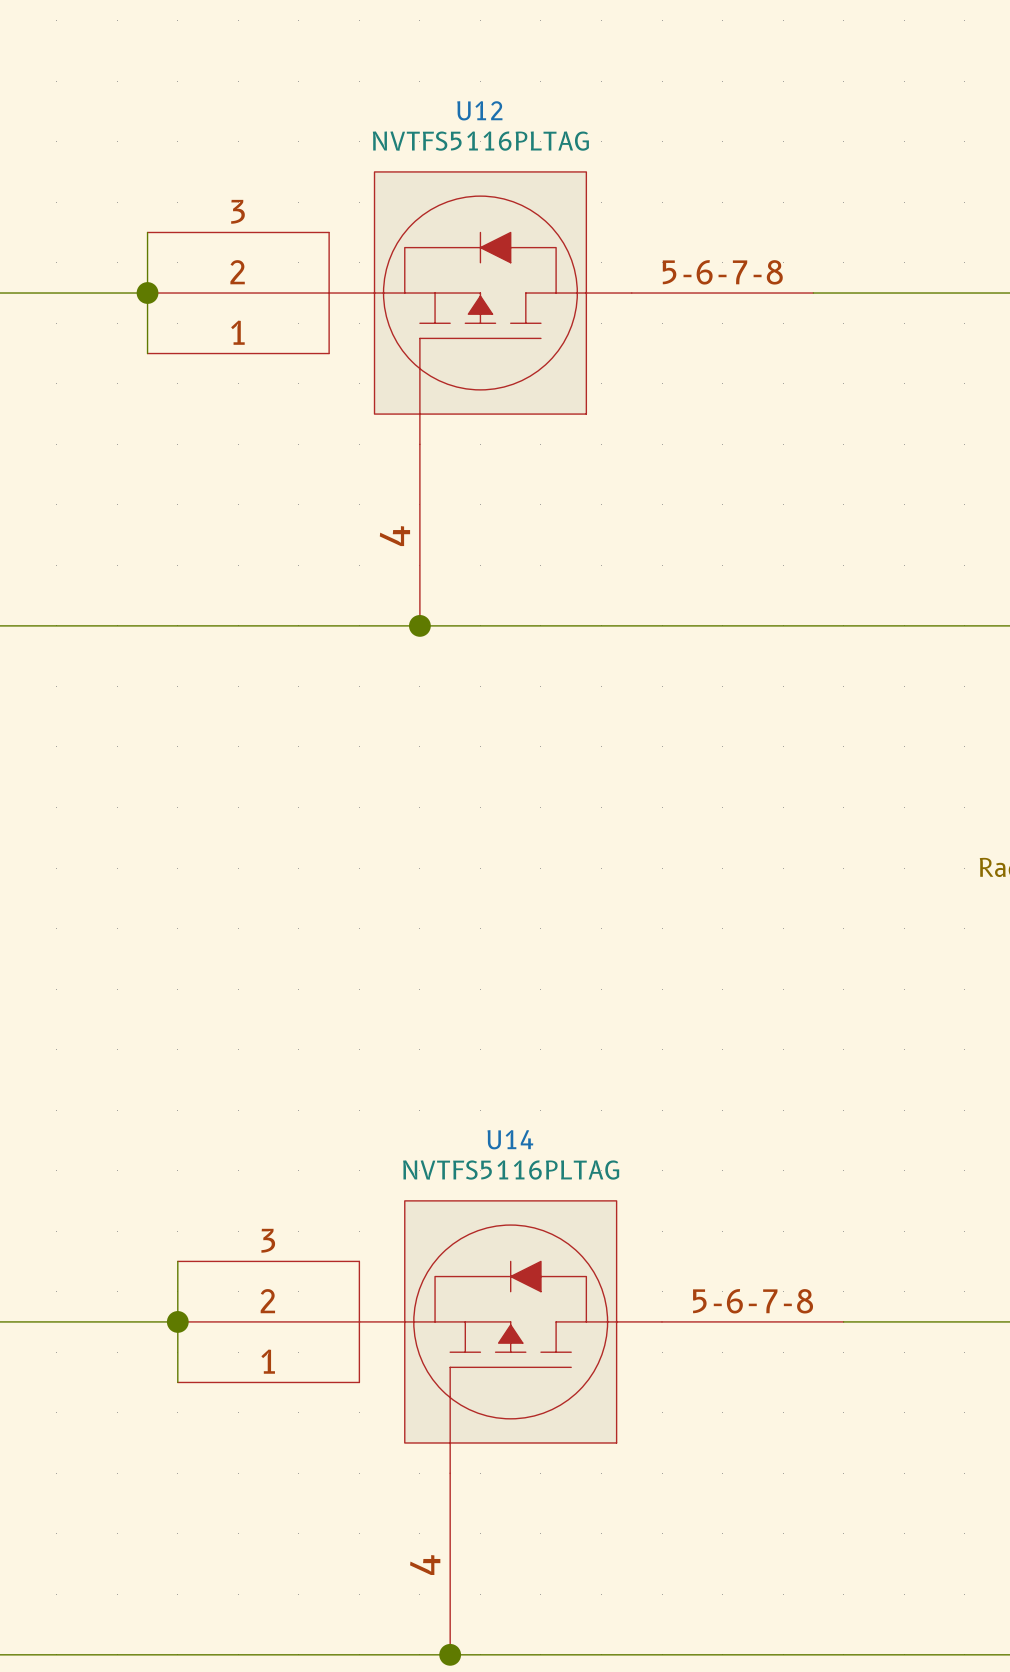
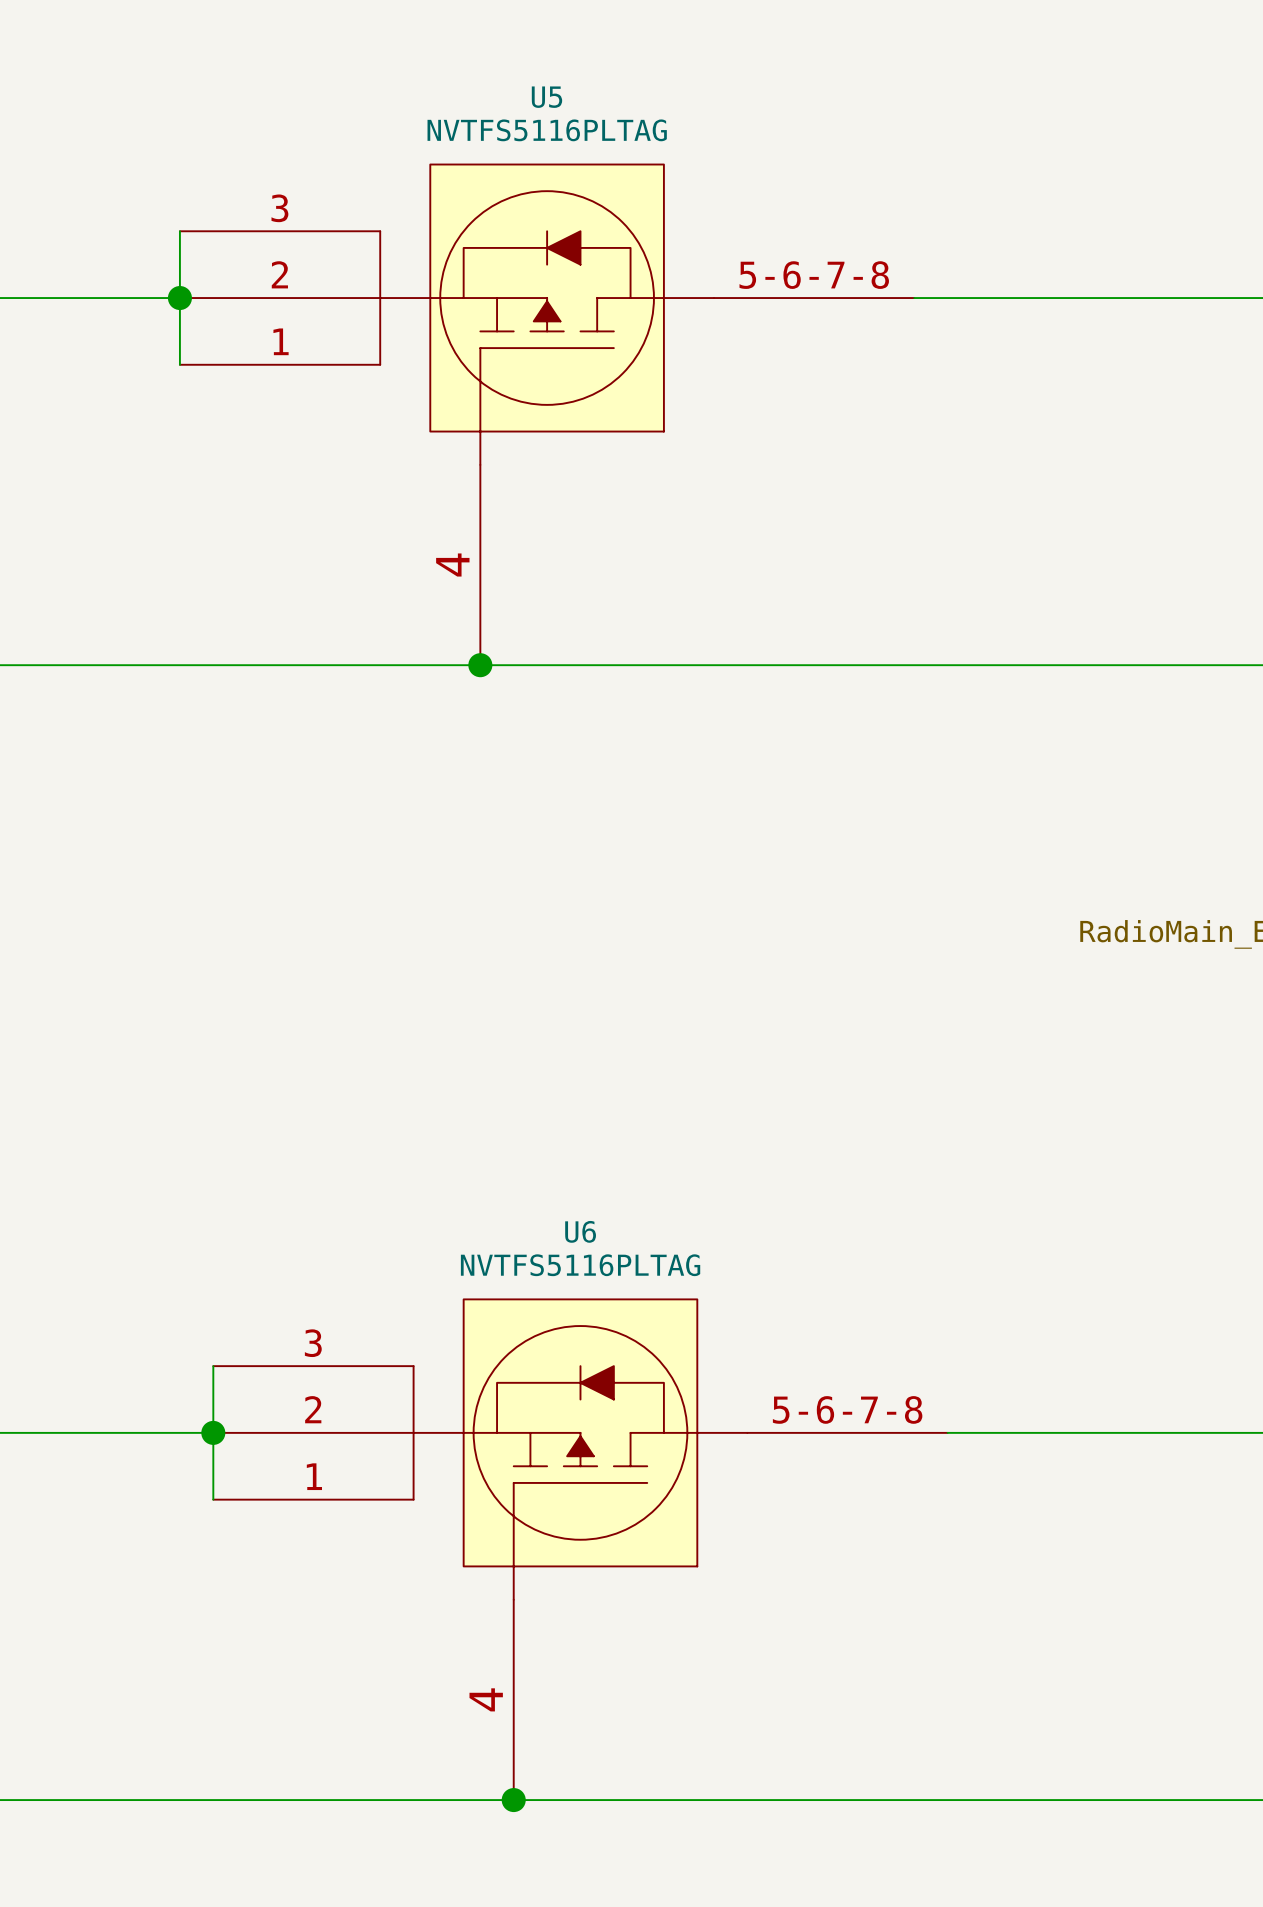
U12 name: U12 (479, 110) -> U5 (546, 97)
U14 name: U14 (510, 1139) -> U6 (580, 1231)

